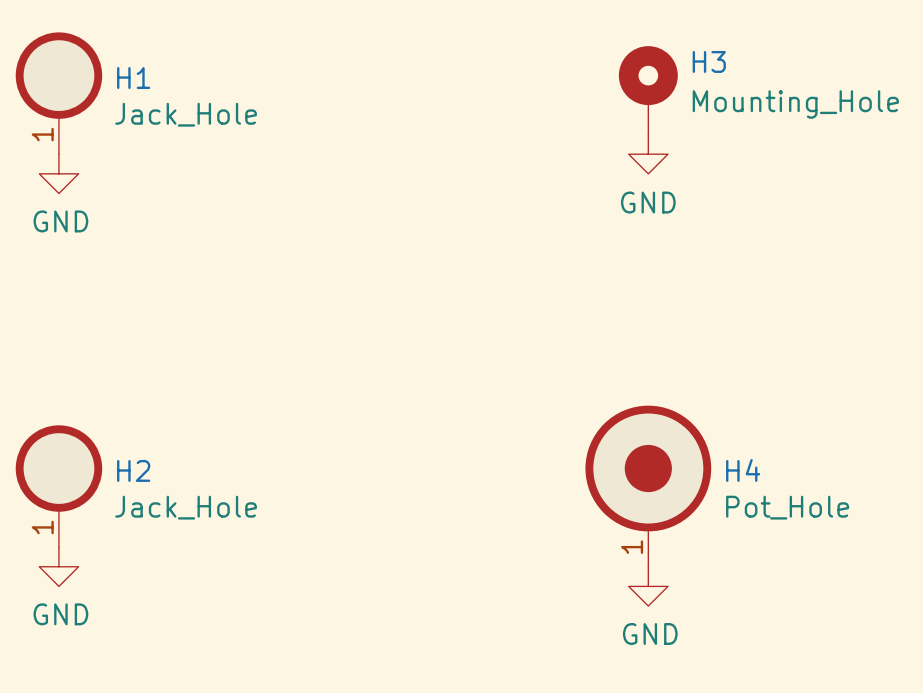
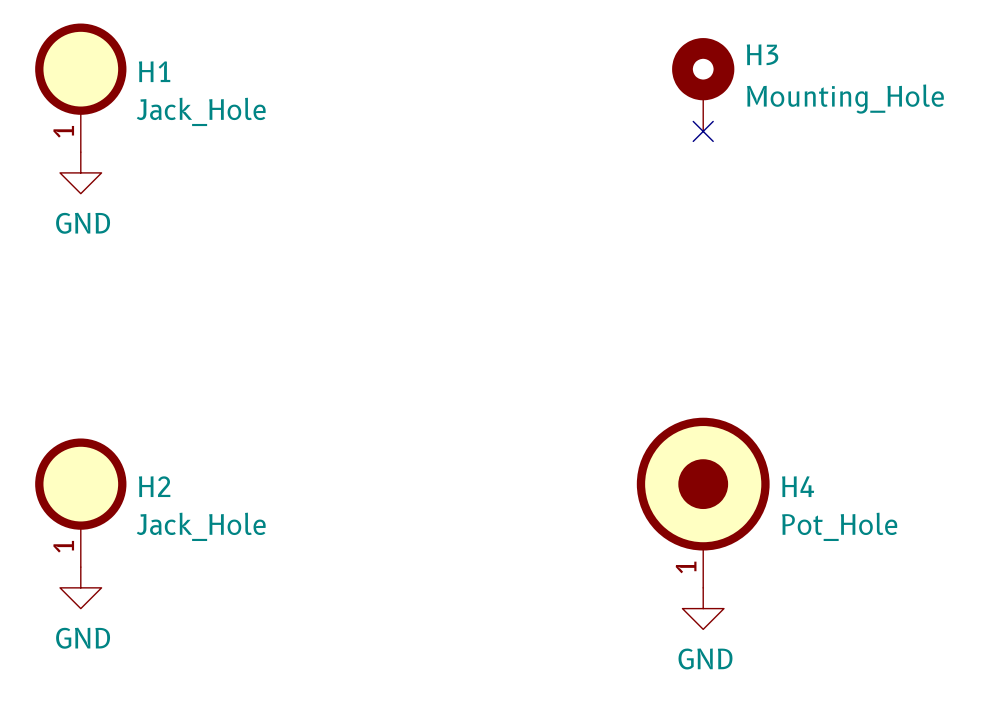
no-connect mark: none -> (703, 131)
power symbol: GND (648, 154) -> none

